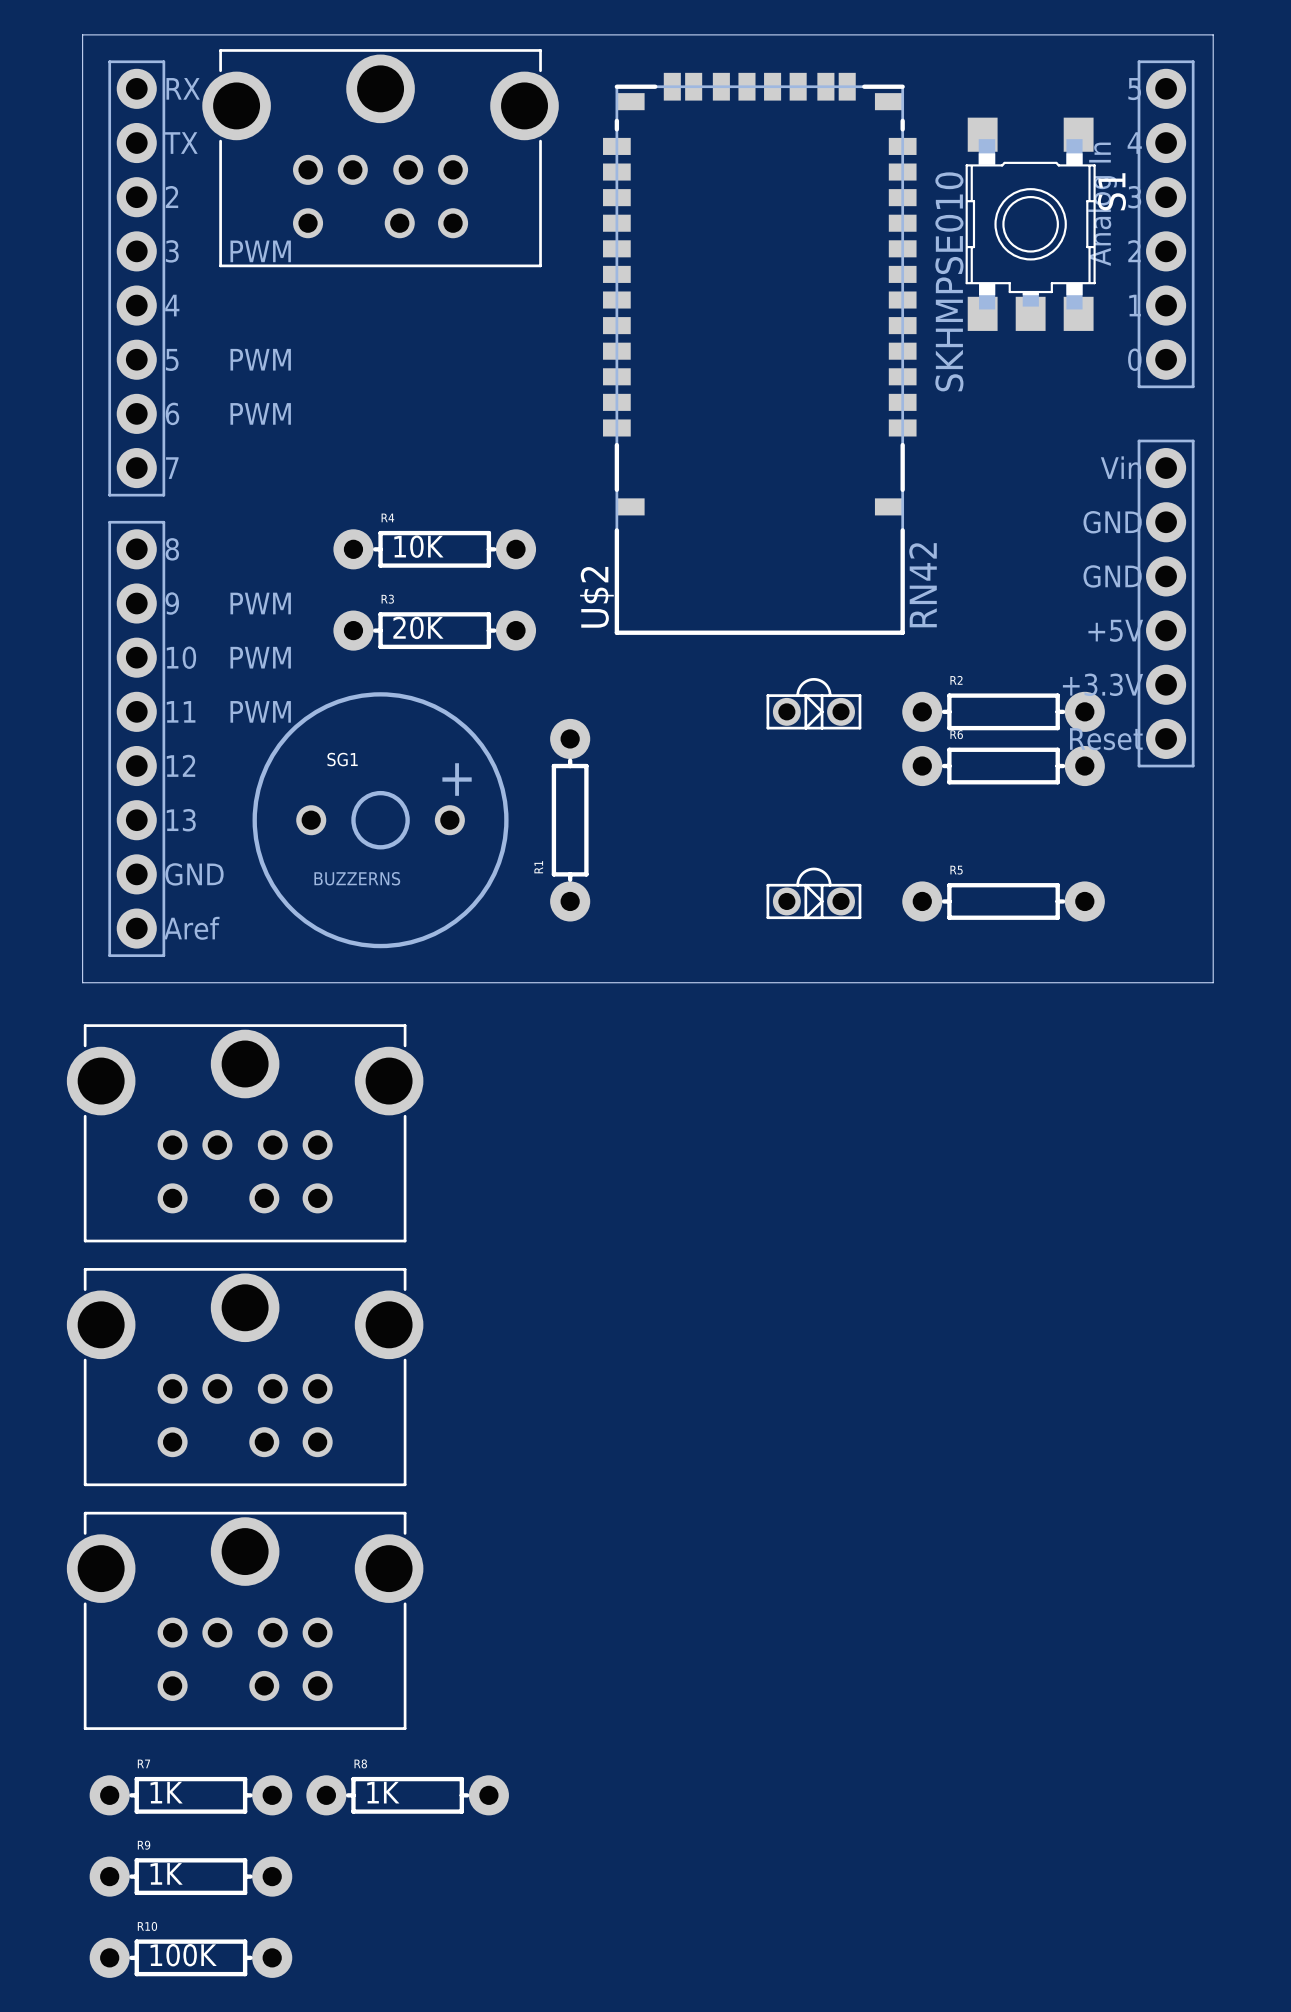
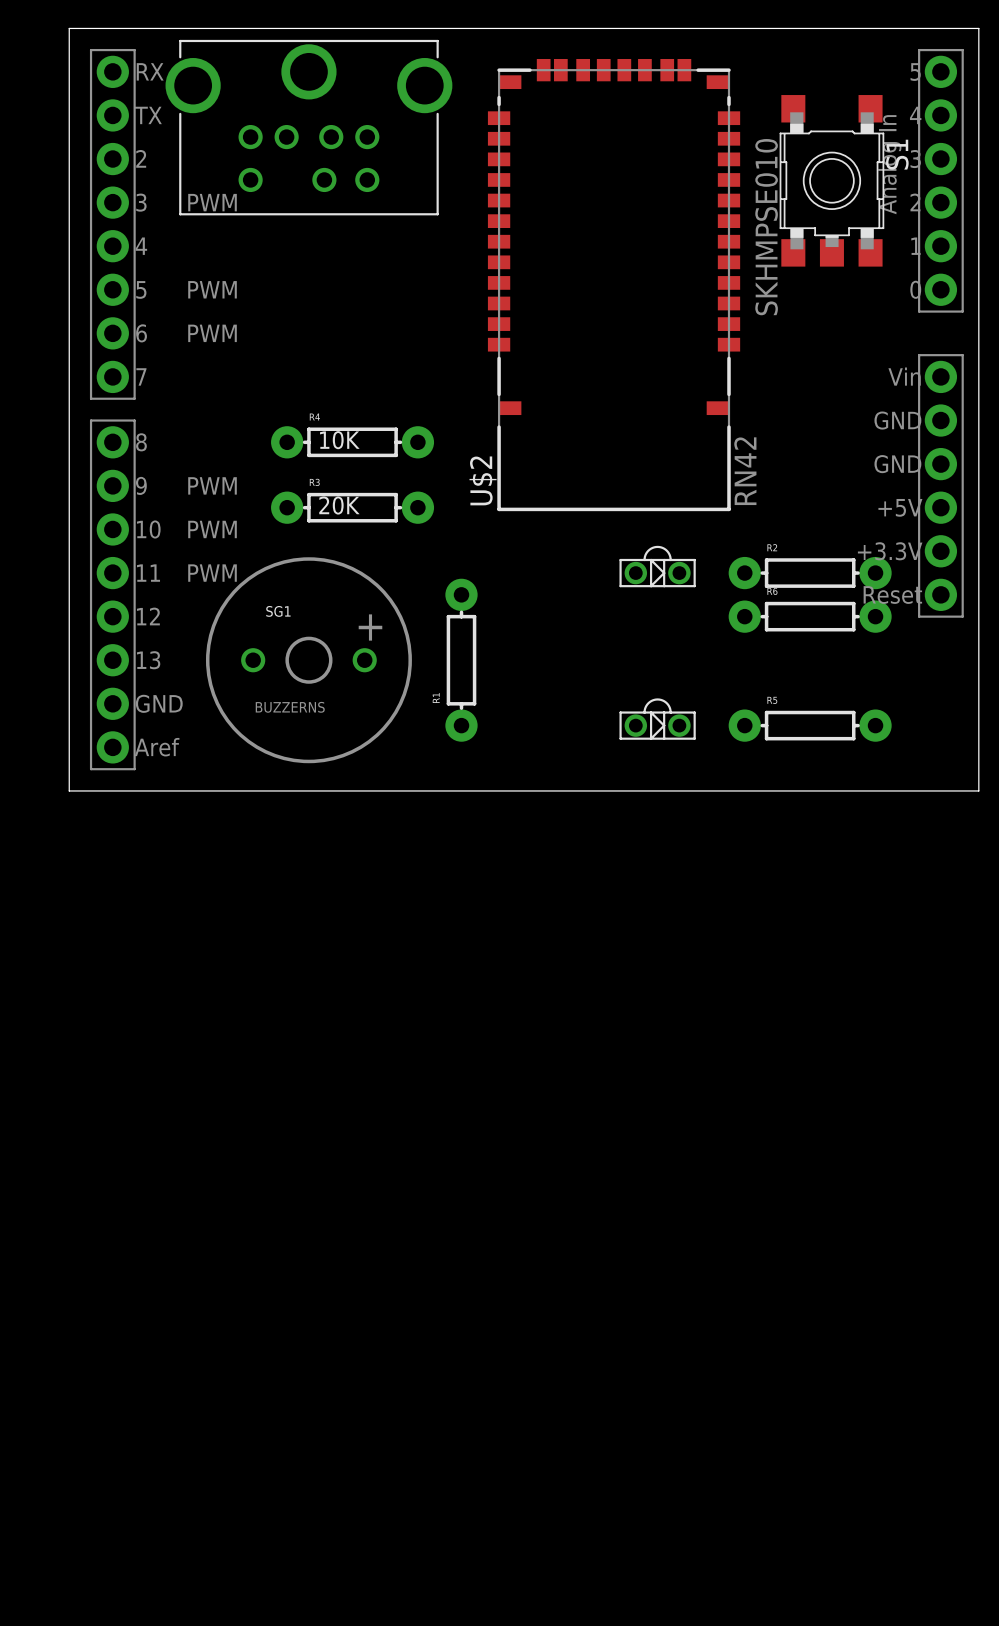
part: (245, 1133) -> none
part: (245, 1377) -> none
part: (245, 1620) -> none
R7: 1K (190, 1795) -> none
R8: 1K (407, 1795) -> none
R9: 1K (190, 1876) -> none
R10: 100K (190, 1957) -> none

